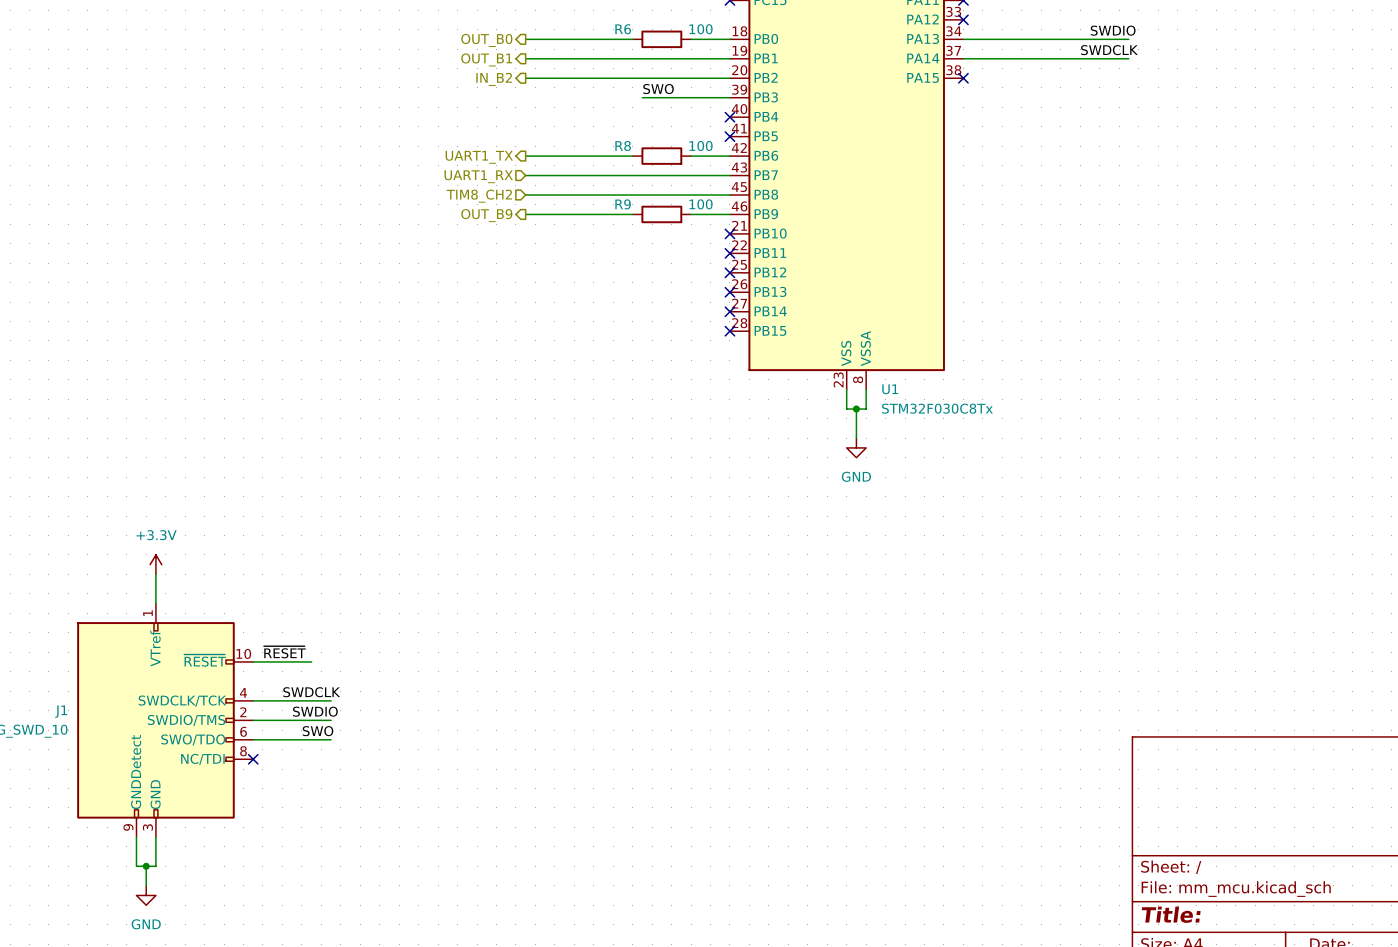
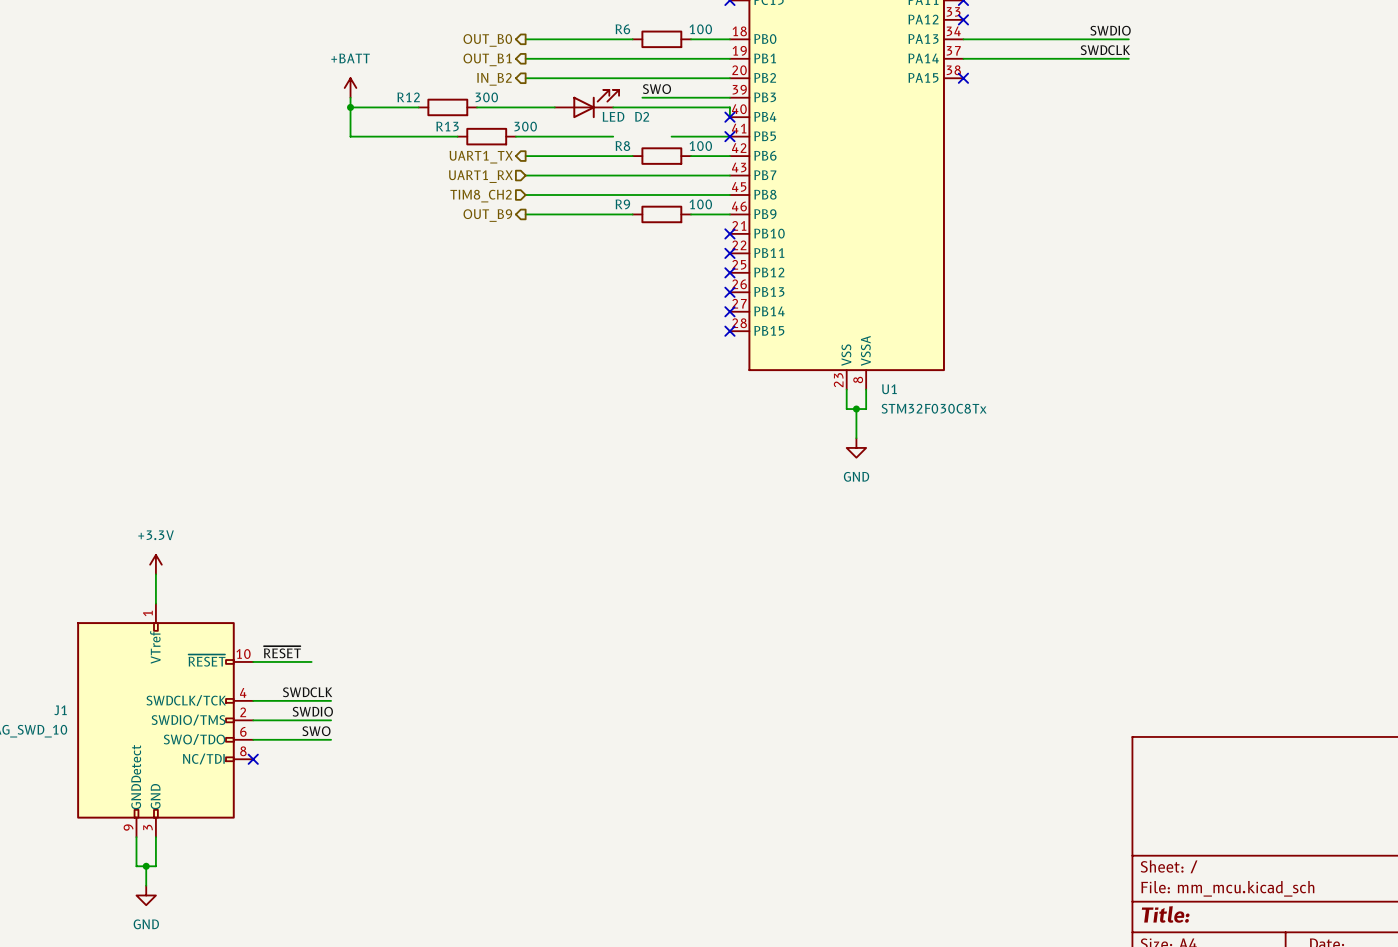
power symbol: none -> +BATT (350, 87)
wire: none -> (350, 97) (350, 136) (457, 136)
D2: none -> LED (586, 104)
wire: none -> (350, 107) (418, 107)
junction: none -> (350, 107)
R12: none -> 300 (447, 107)
wire: none -> (477, 107) (554, 107)
wire: none -> (613, 107) (729, 107) (729, 117)
R13: none -> 300 (486, 136)
wire: none -> (515, 136) (613, 136)
wire: none -> (671, 136) (729, 136)

